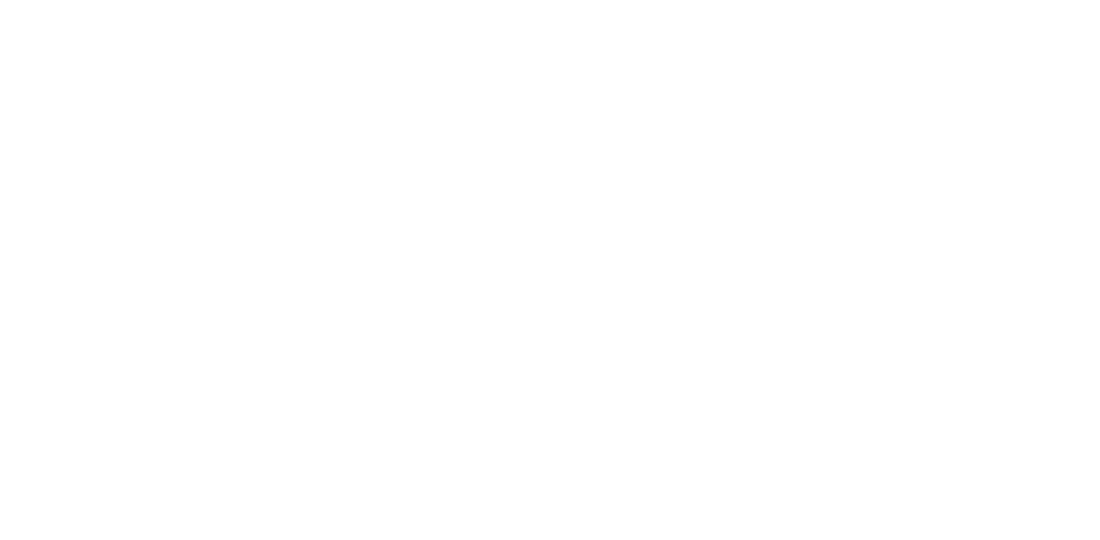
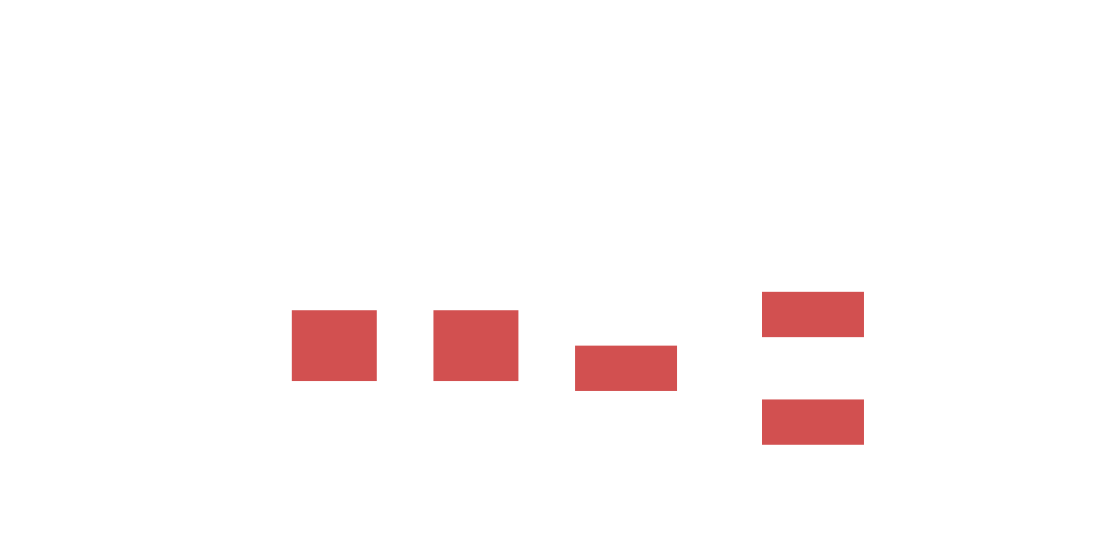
part: none -> (405, 345)
part: none -> (719, 368)

